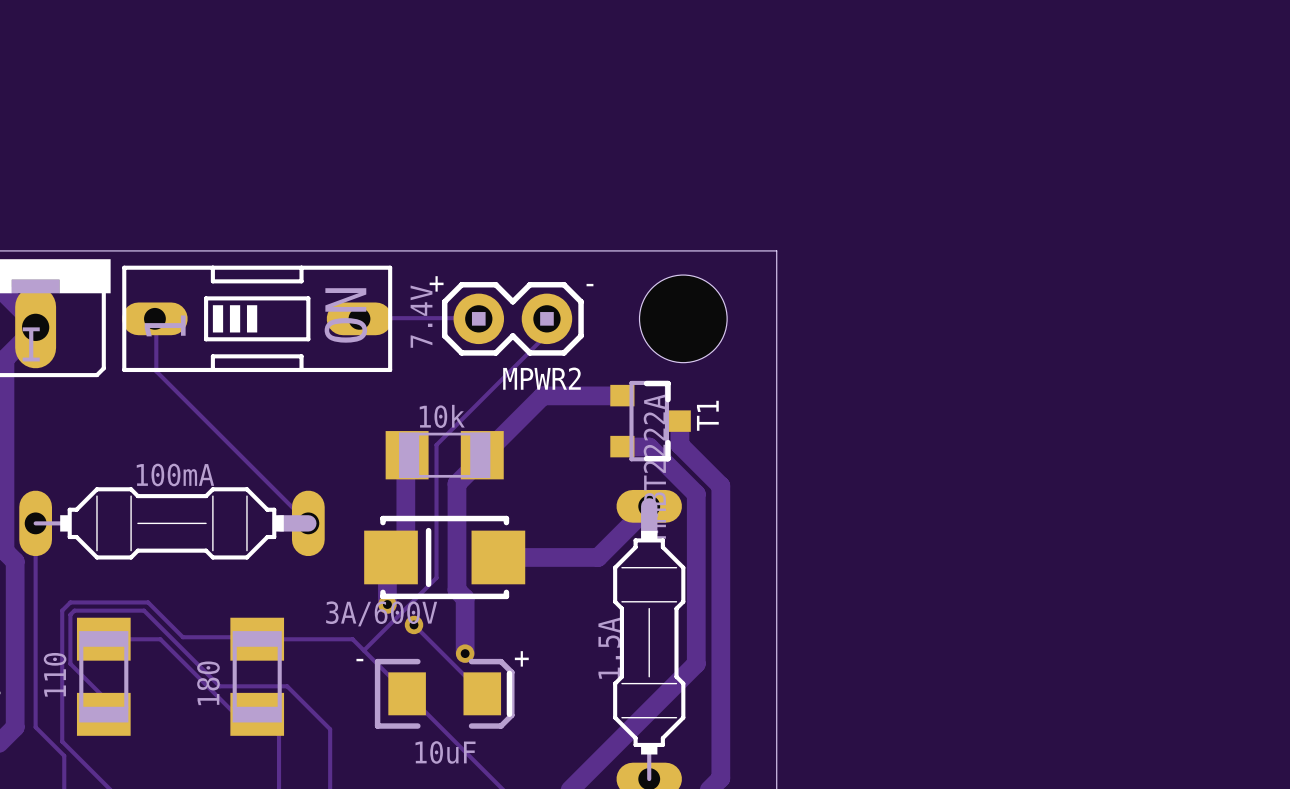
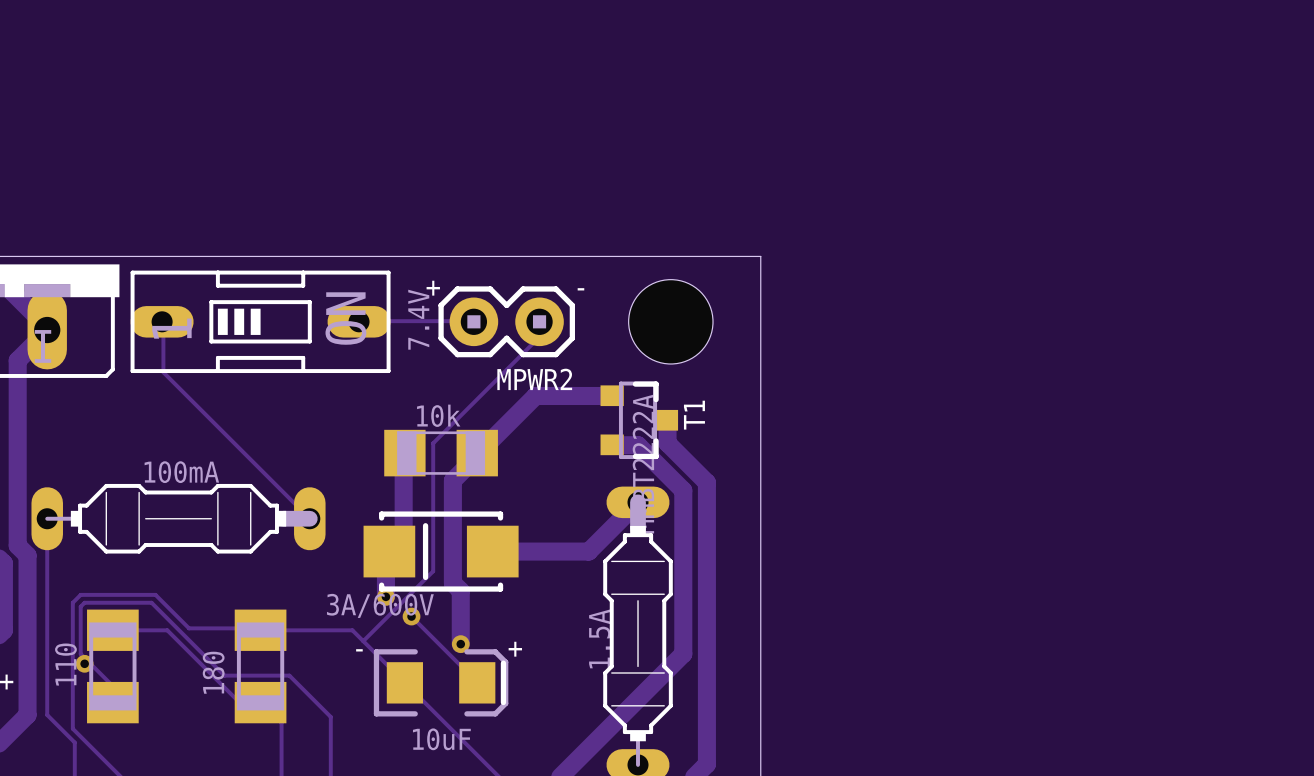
via: none -> (84, 663)

